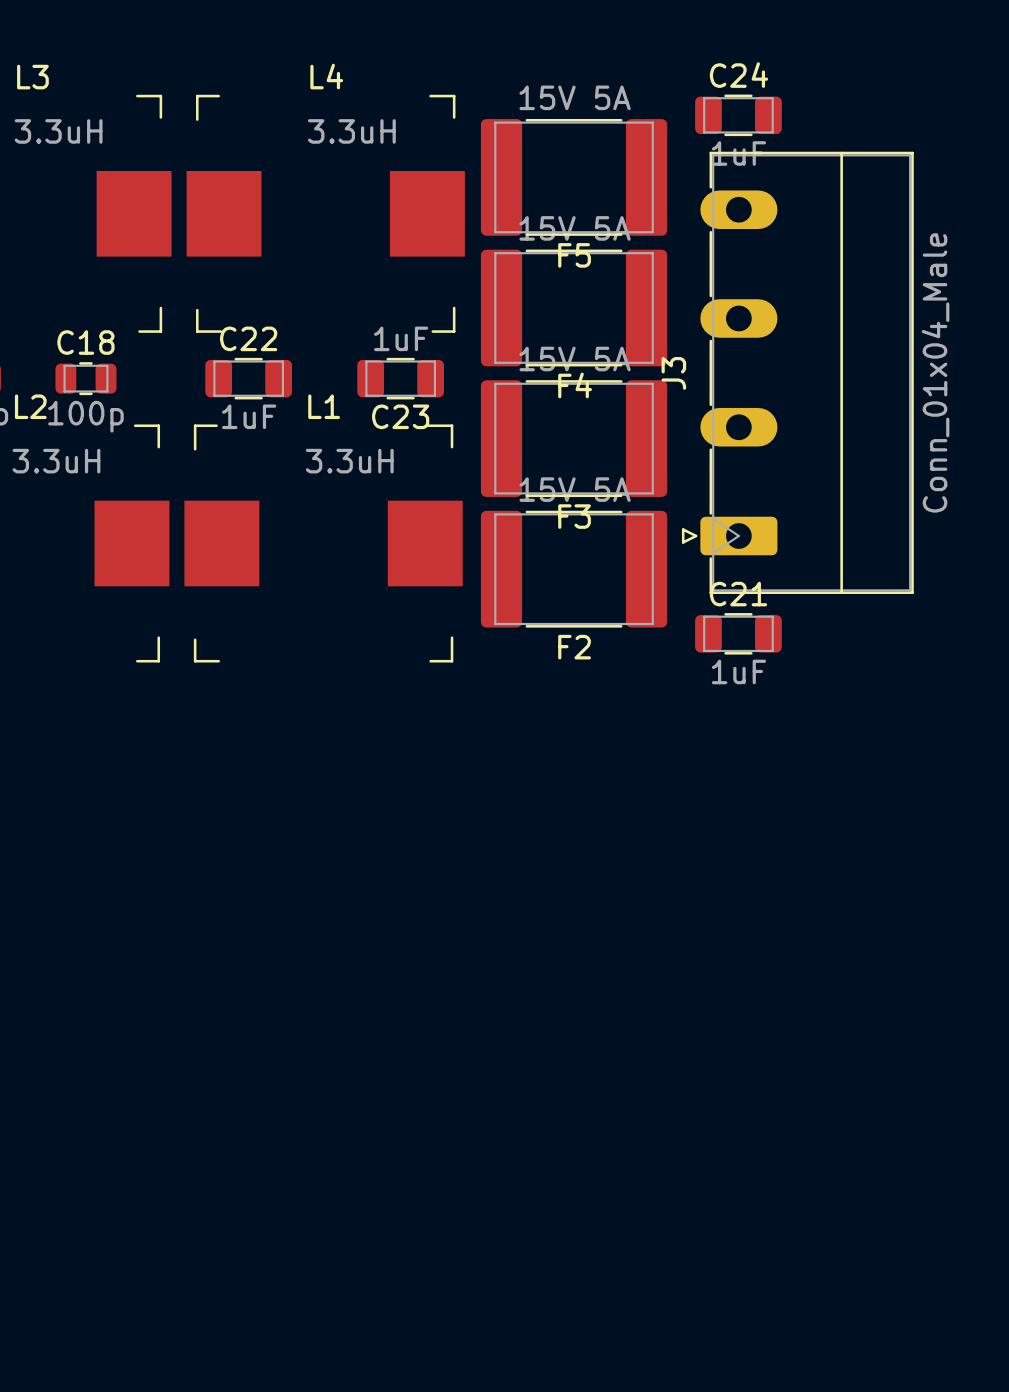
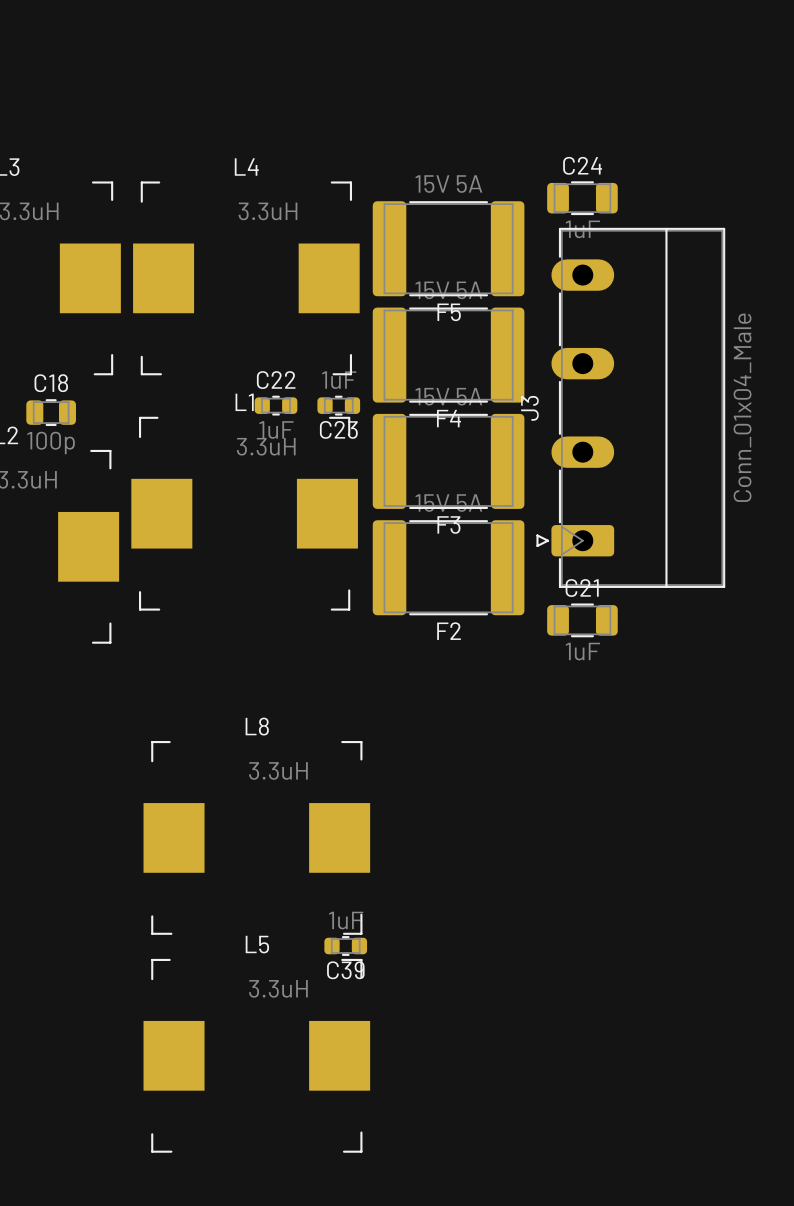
C22 footprint: [205, 357, 293, 400] -> [254, 395, 298, 416]
C23 footprint: [357, 357, 444, 400] -> [317, 395, 361, 416]
L1 position: (323, 543) -> (244, 513)
L8: none -> 3.3uH (256, 837)
C39: none -> 1uF (345, 946)
L5: none -> 3.3uH (256, 1055)

